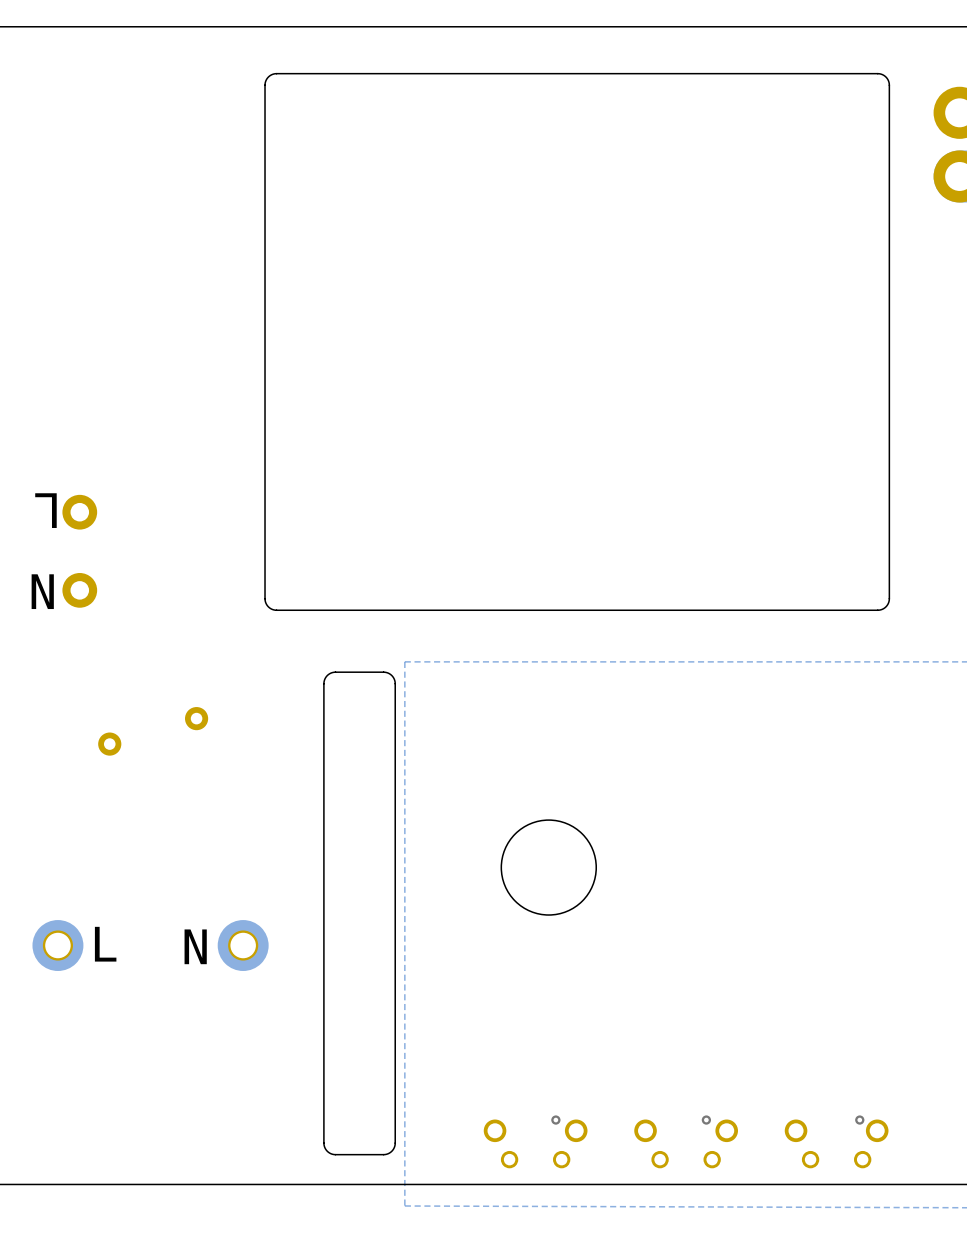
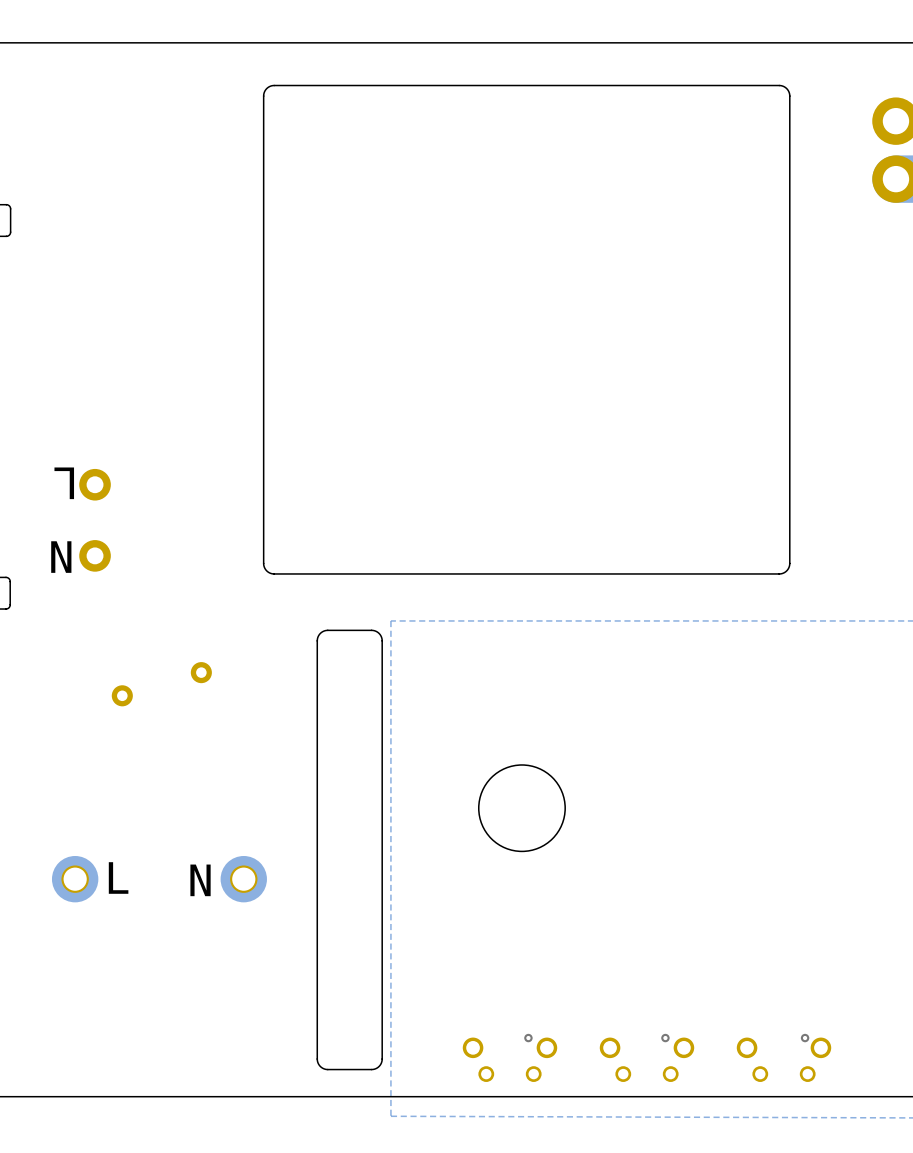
board edge: (831, 73) (880, 74) (886, 78) (889, 85) (889, 600) (885, 606) (879, 610) (831, 610) -> (779, 85) (786, 88) (789, 96) (789, 563) (786, 570) (779, 573)

